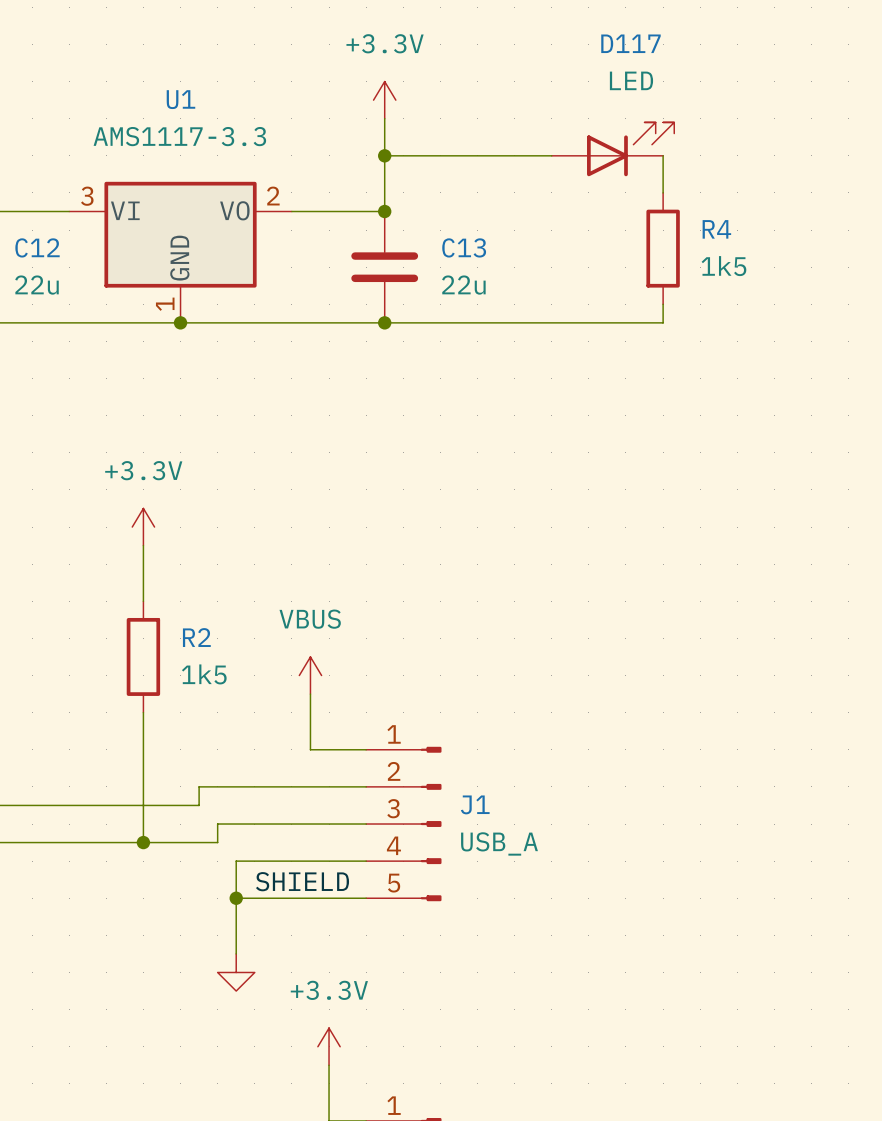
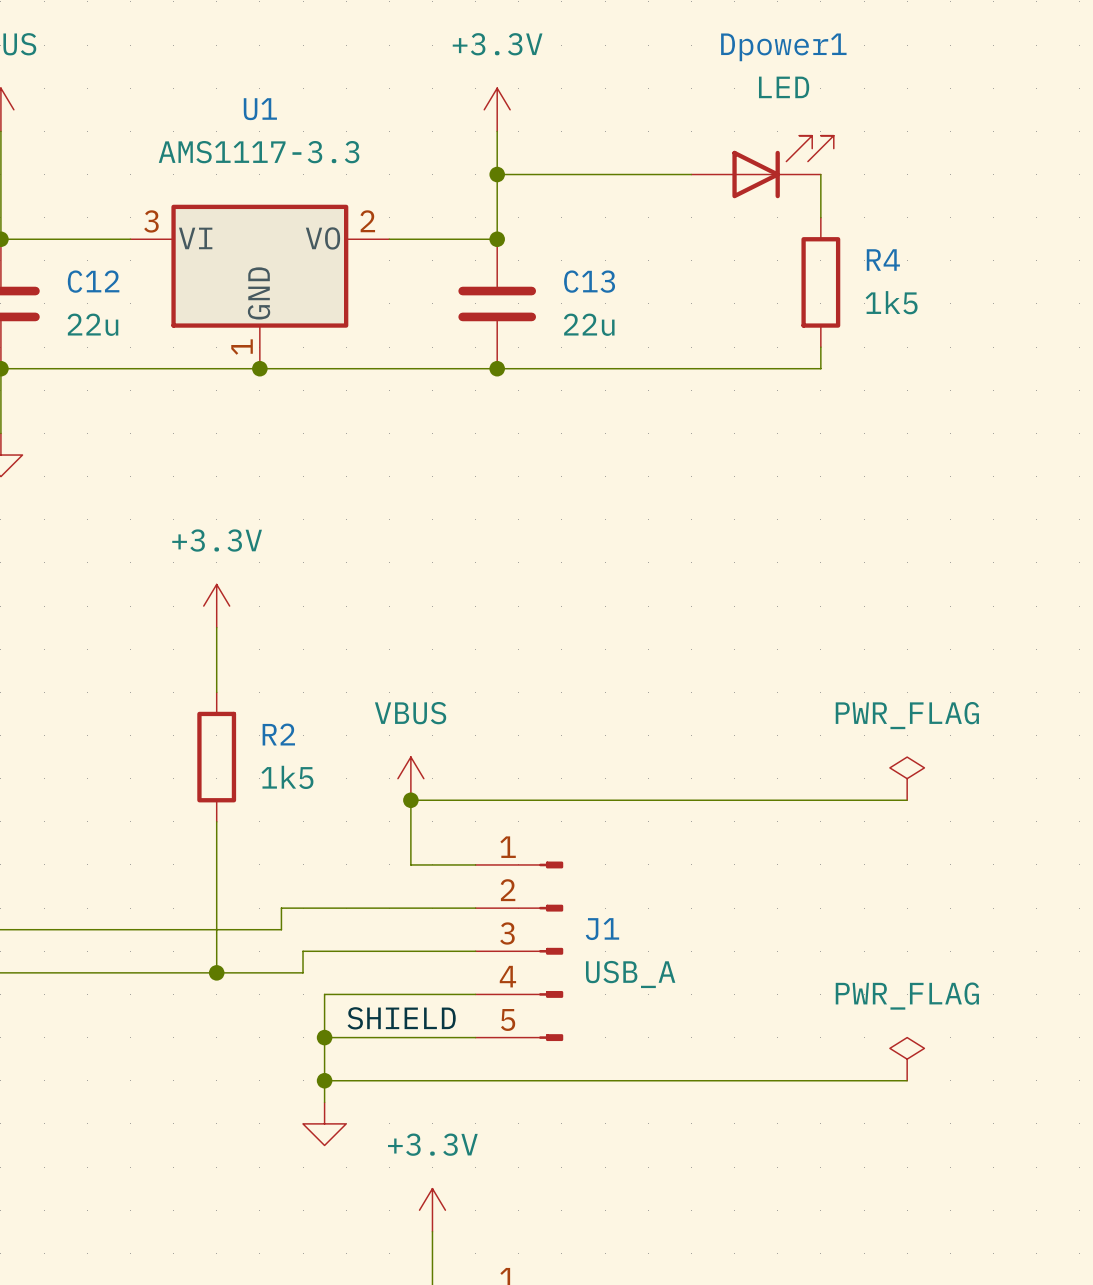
D117 name: D117 (630, 43) -> Dpower1 (783, 47)
power symbol: none -> PWR_FLAG (907, 778)
wire: none -> (410, 800) (907, 800)
junction: none -> (410, 800)
power symbol: none -> PWR_FLAG (907, 1059)
wire: none -> (324, 1080) (907, 1080)
junction: none -> (324, 1080)

